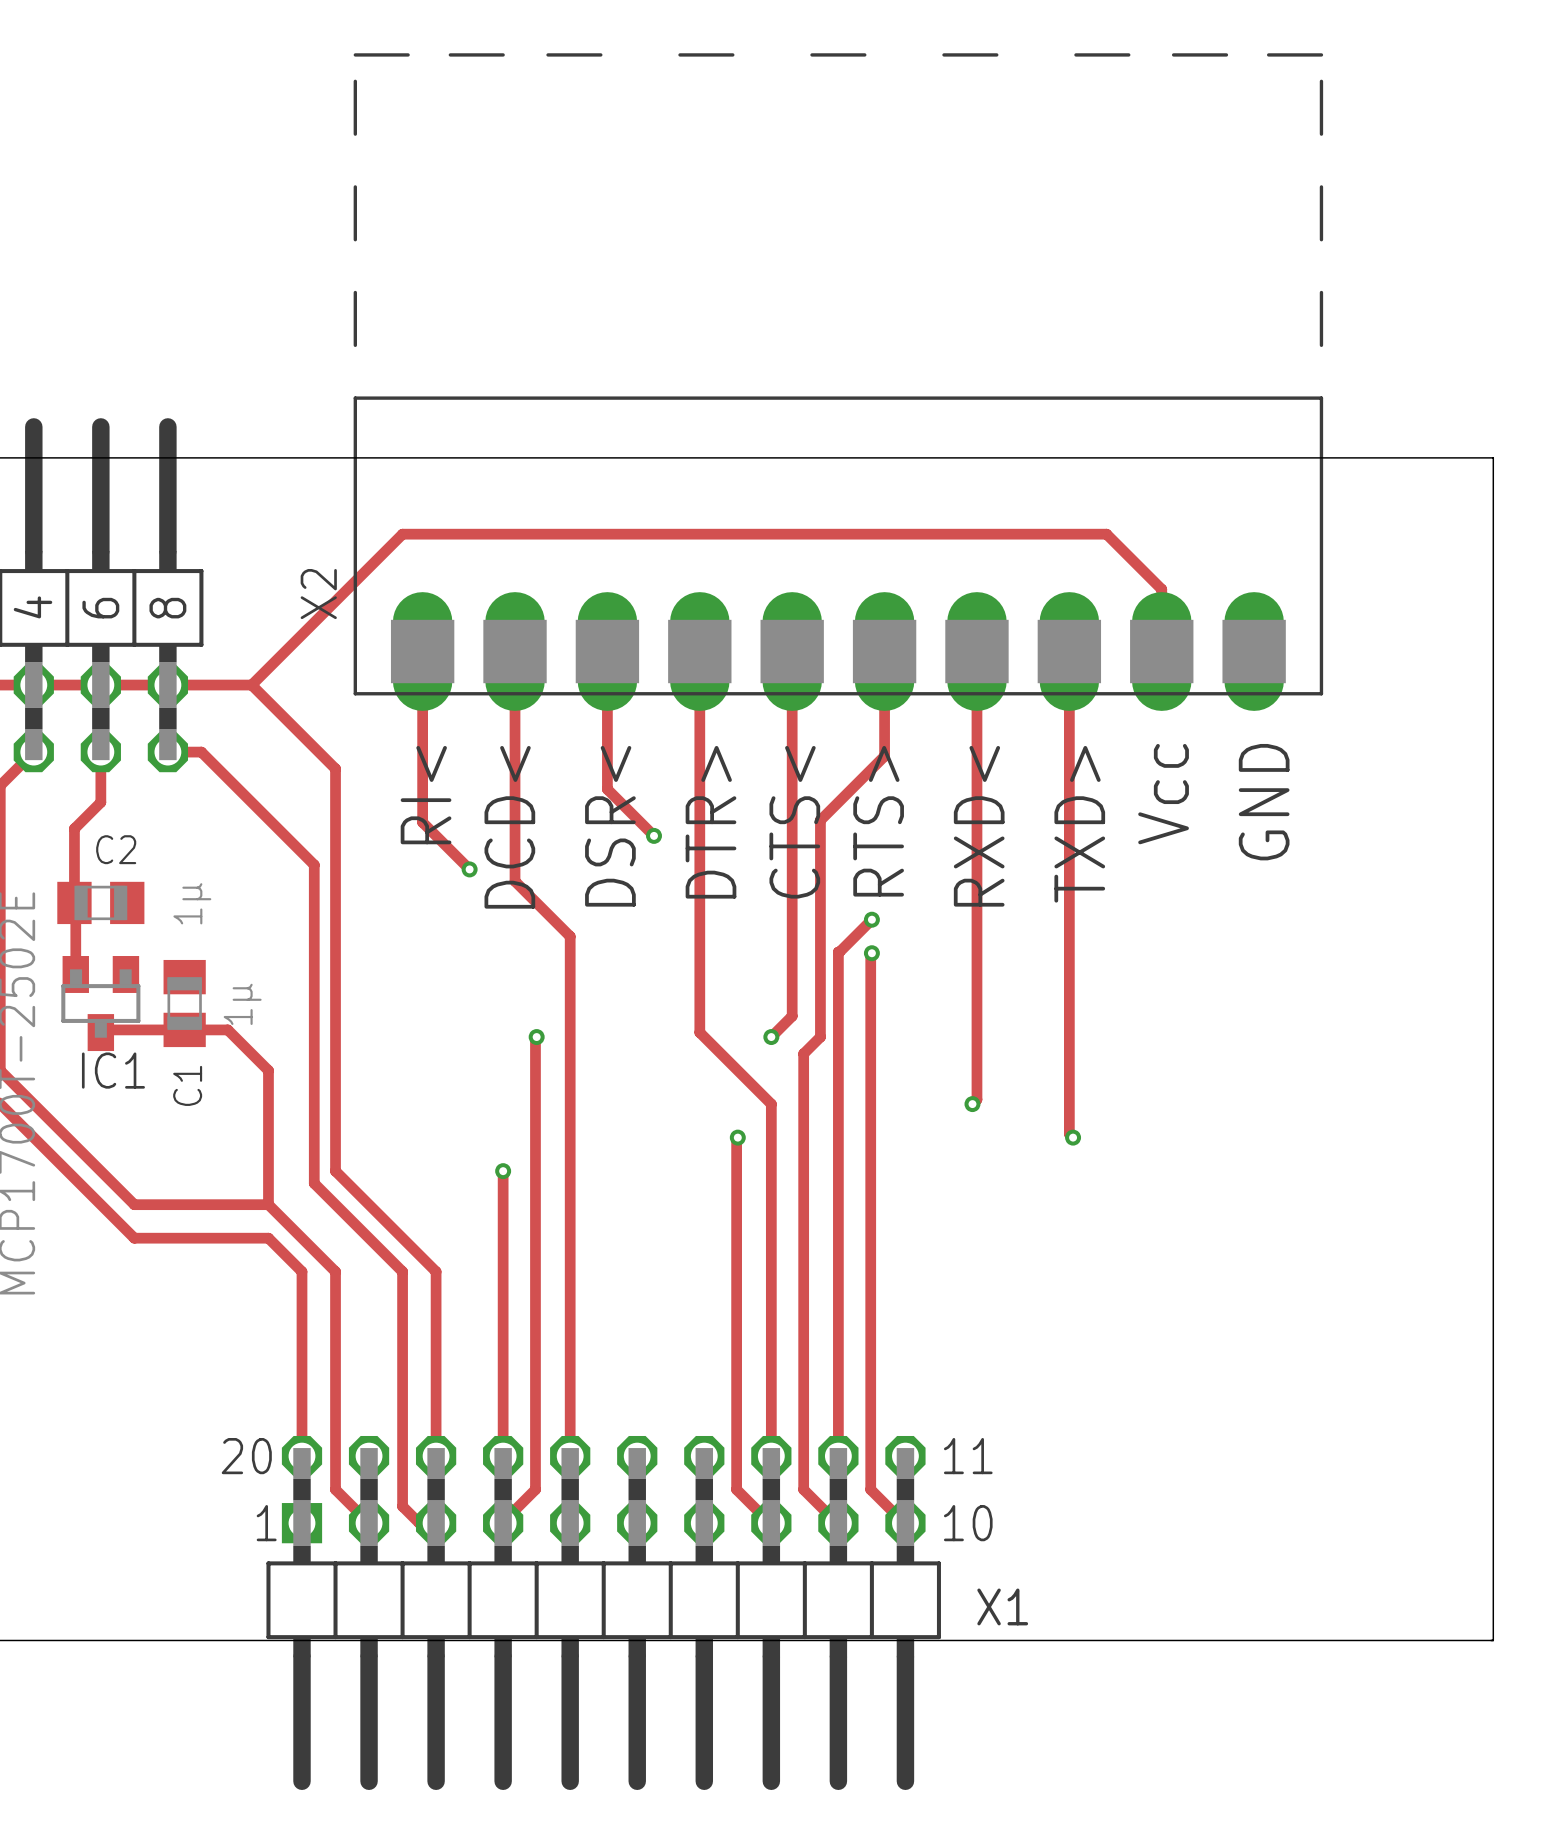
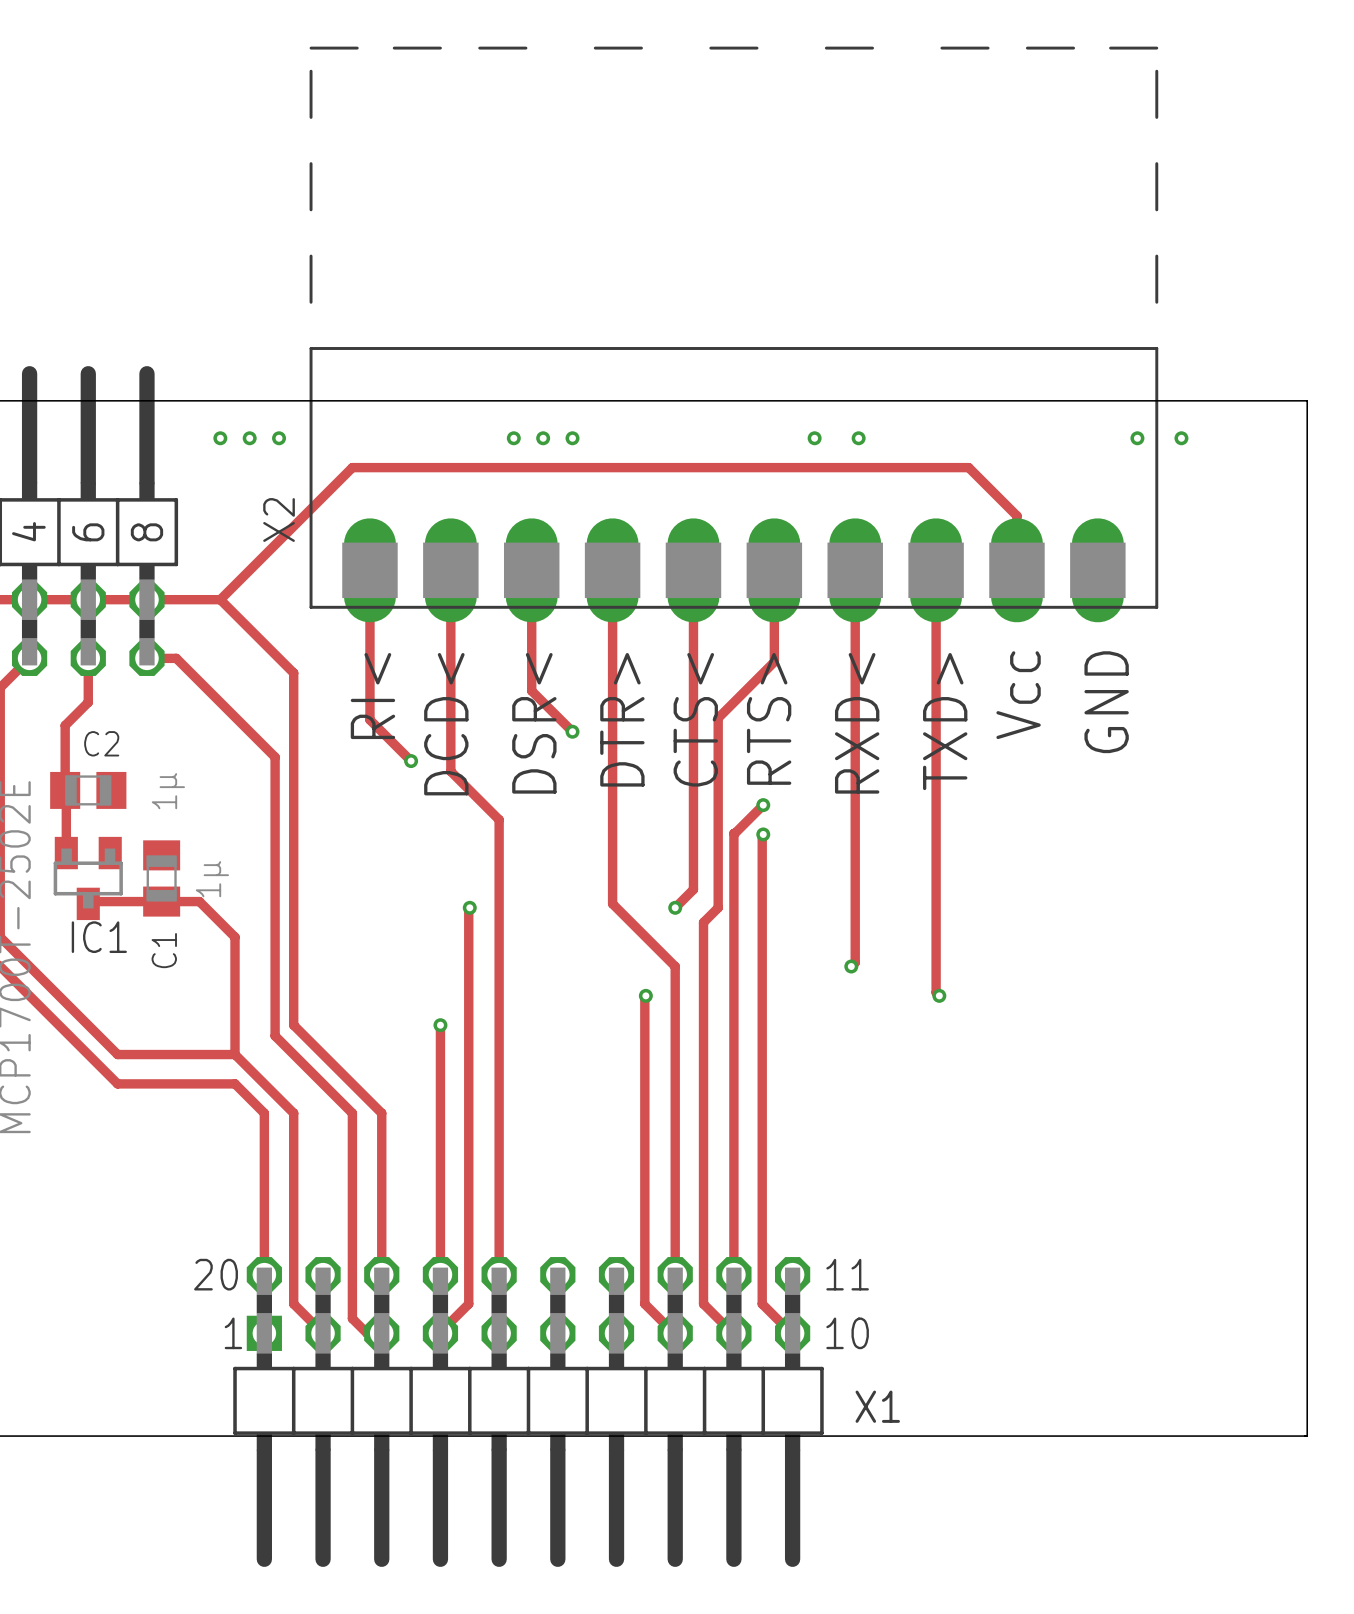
via: none -> (220, 438)
via: none -> (249, 438)
via: none -> (279, 438)
via: none -> (513, 438)
via: none -> (543, 438)
via: none -> (572, 438)
via: none -> (814, 438)
via: none -> (858, 438)
via: none -> (1137, 438)
via: none -> (1181, 438)

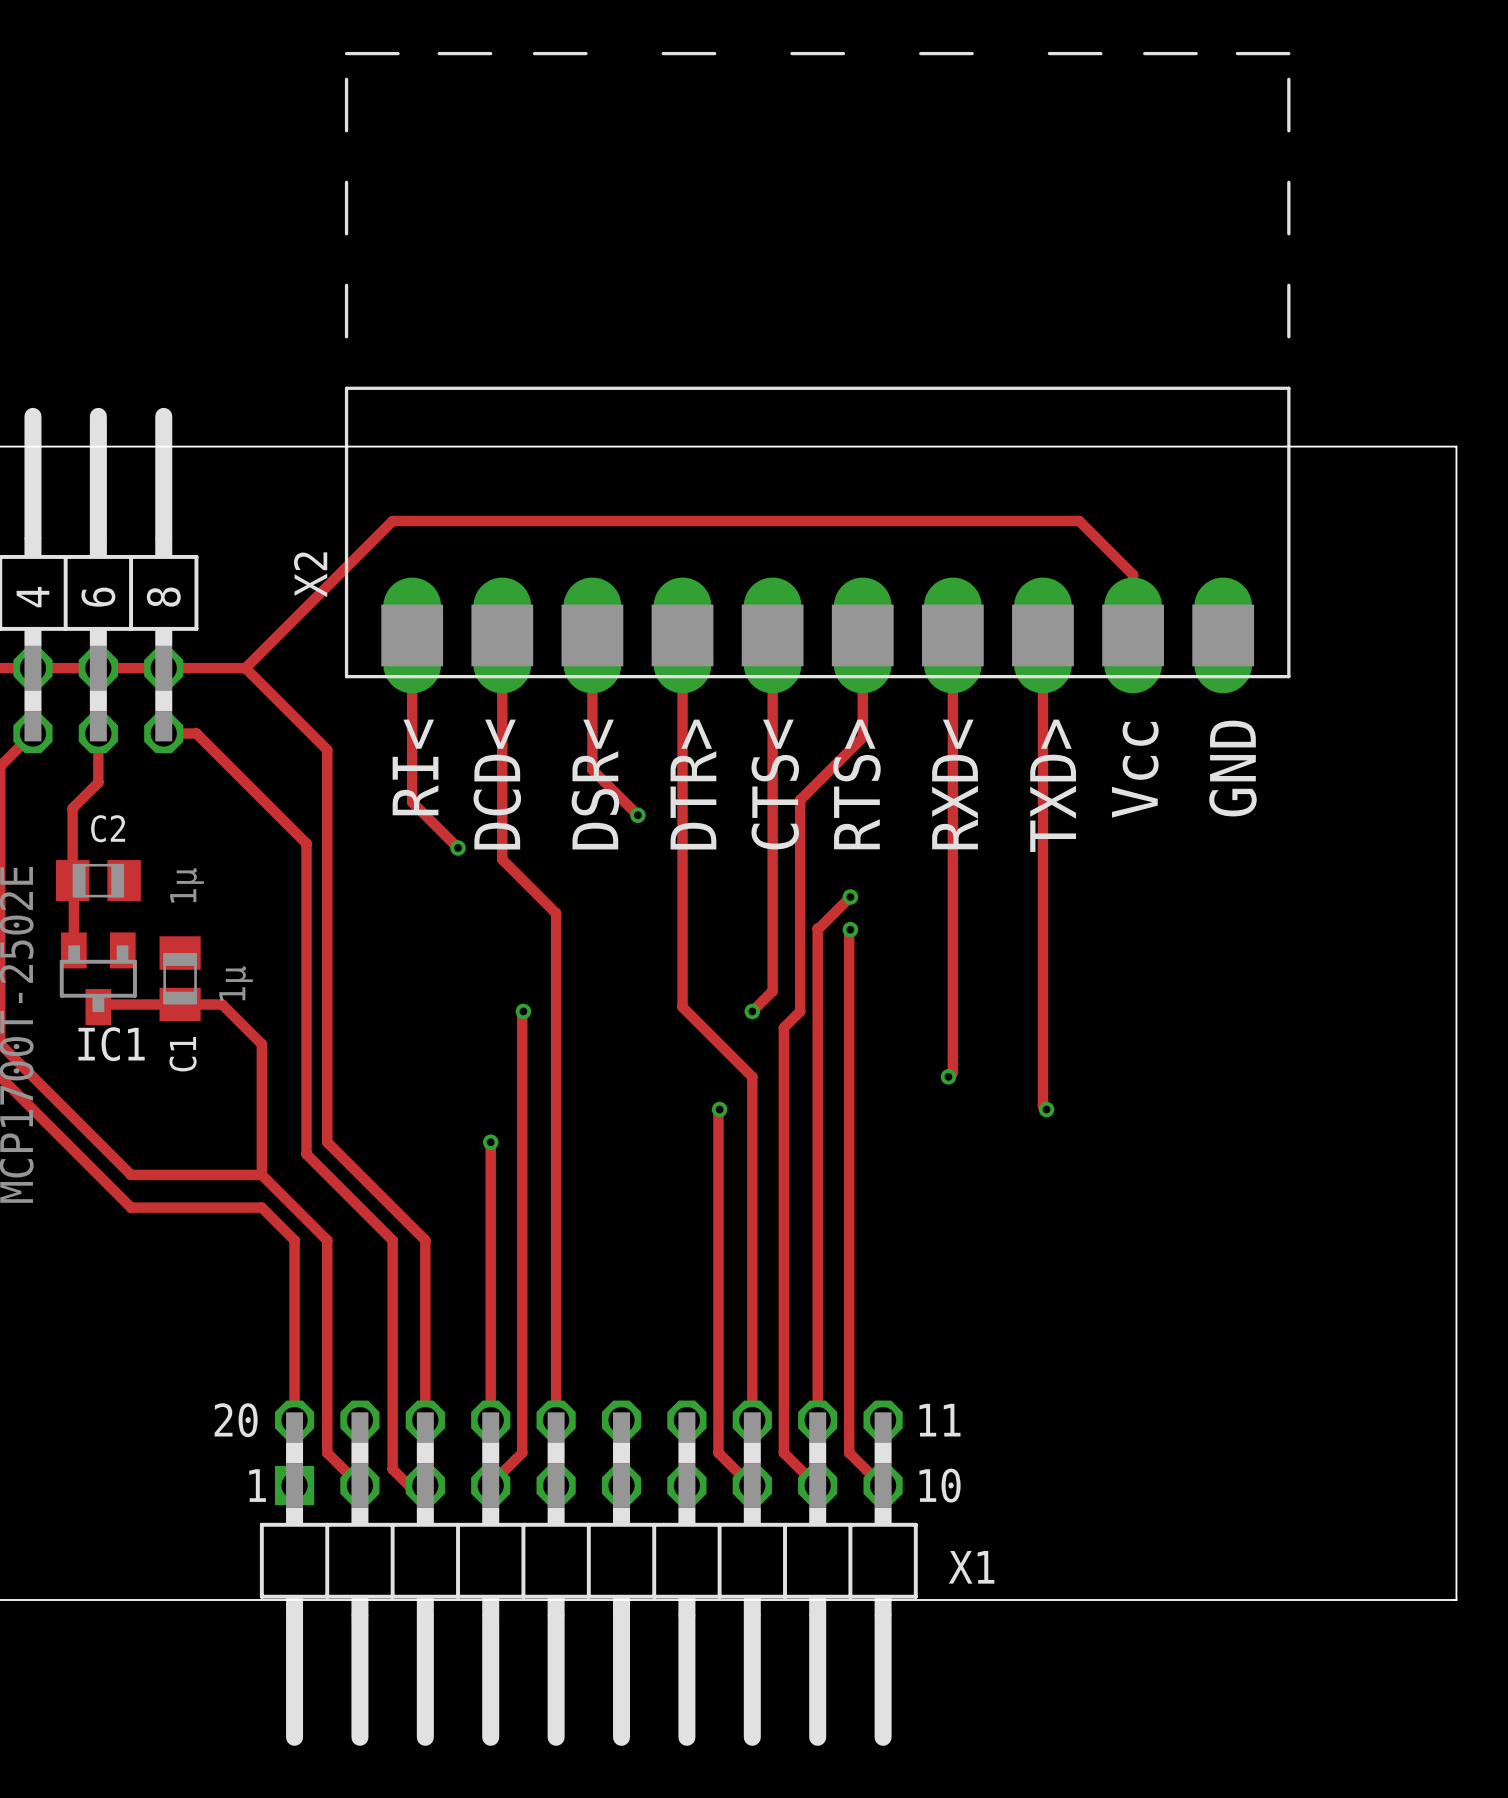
via: (220, 438) -> none
via: (249, 438) -> none
via: (279, 438) -> none
via: (513, 438) -> none
via: (543, 438) -> none
via: (572, 438) -> none
via: (814, 438) -> none
via: (858, 438) -> none
via: (1137, 438) -> none
via: (1181, 438) -> none

